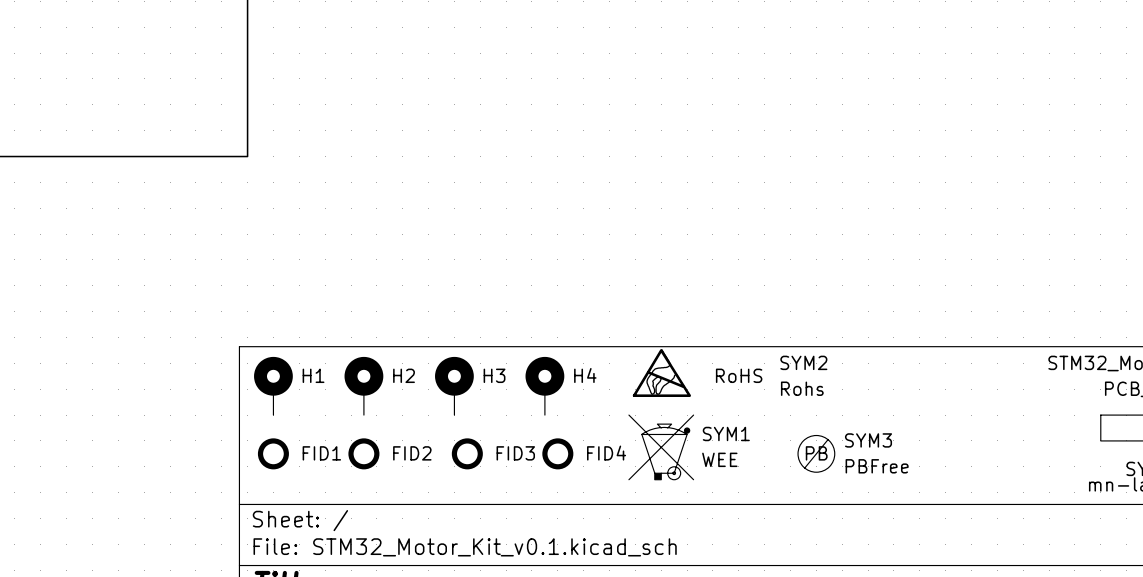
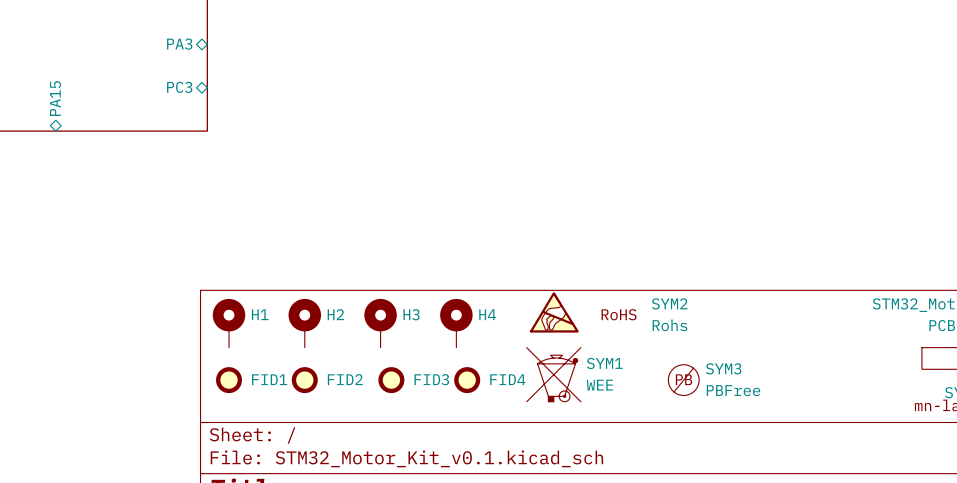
sheet pin: none -> PA3 (179, 44)
sheet pin: none -> PC3 (179, 87)
sheet pin: none -> PA15 (55, 98)

